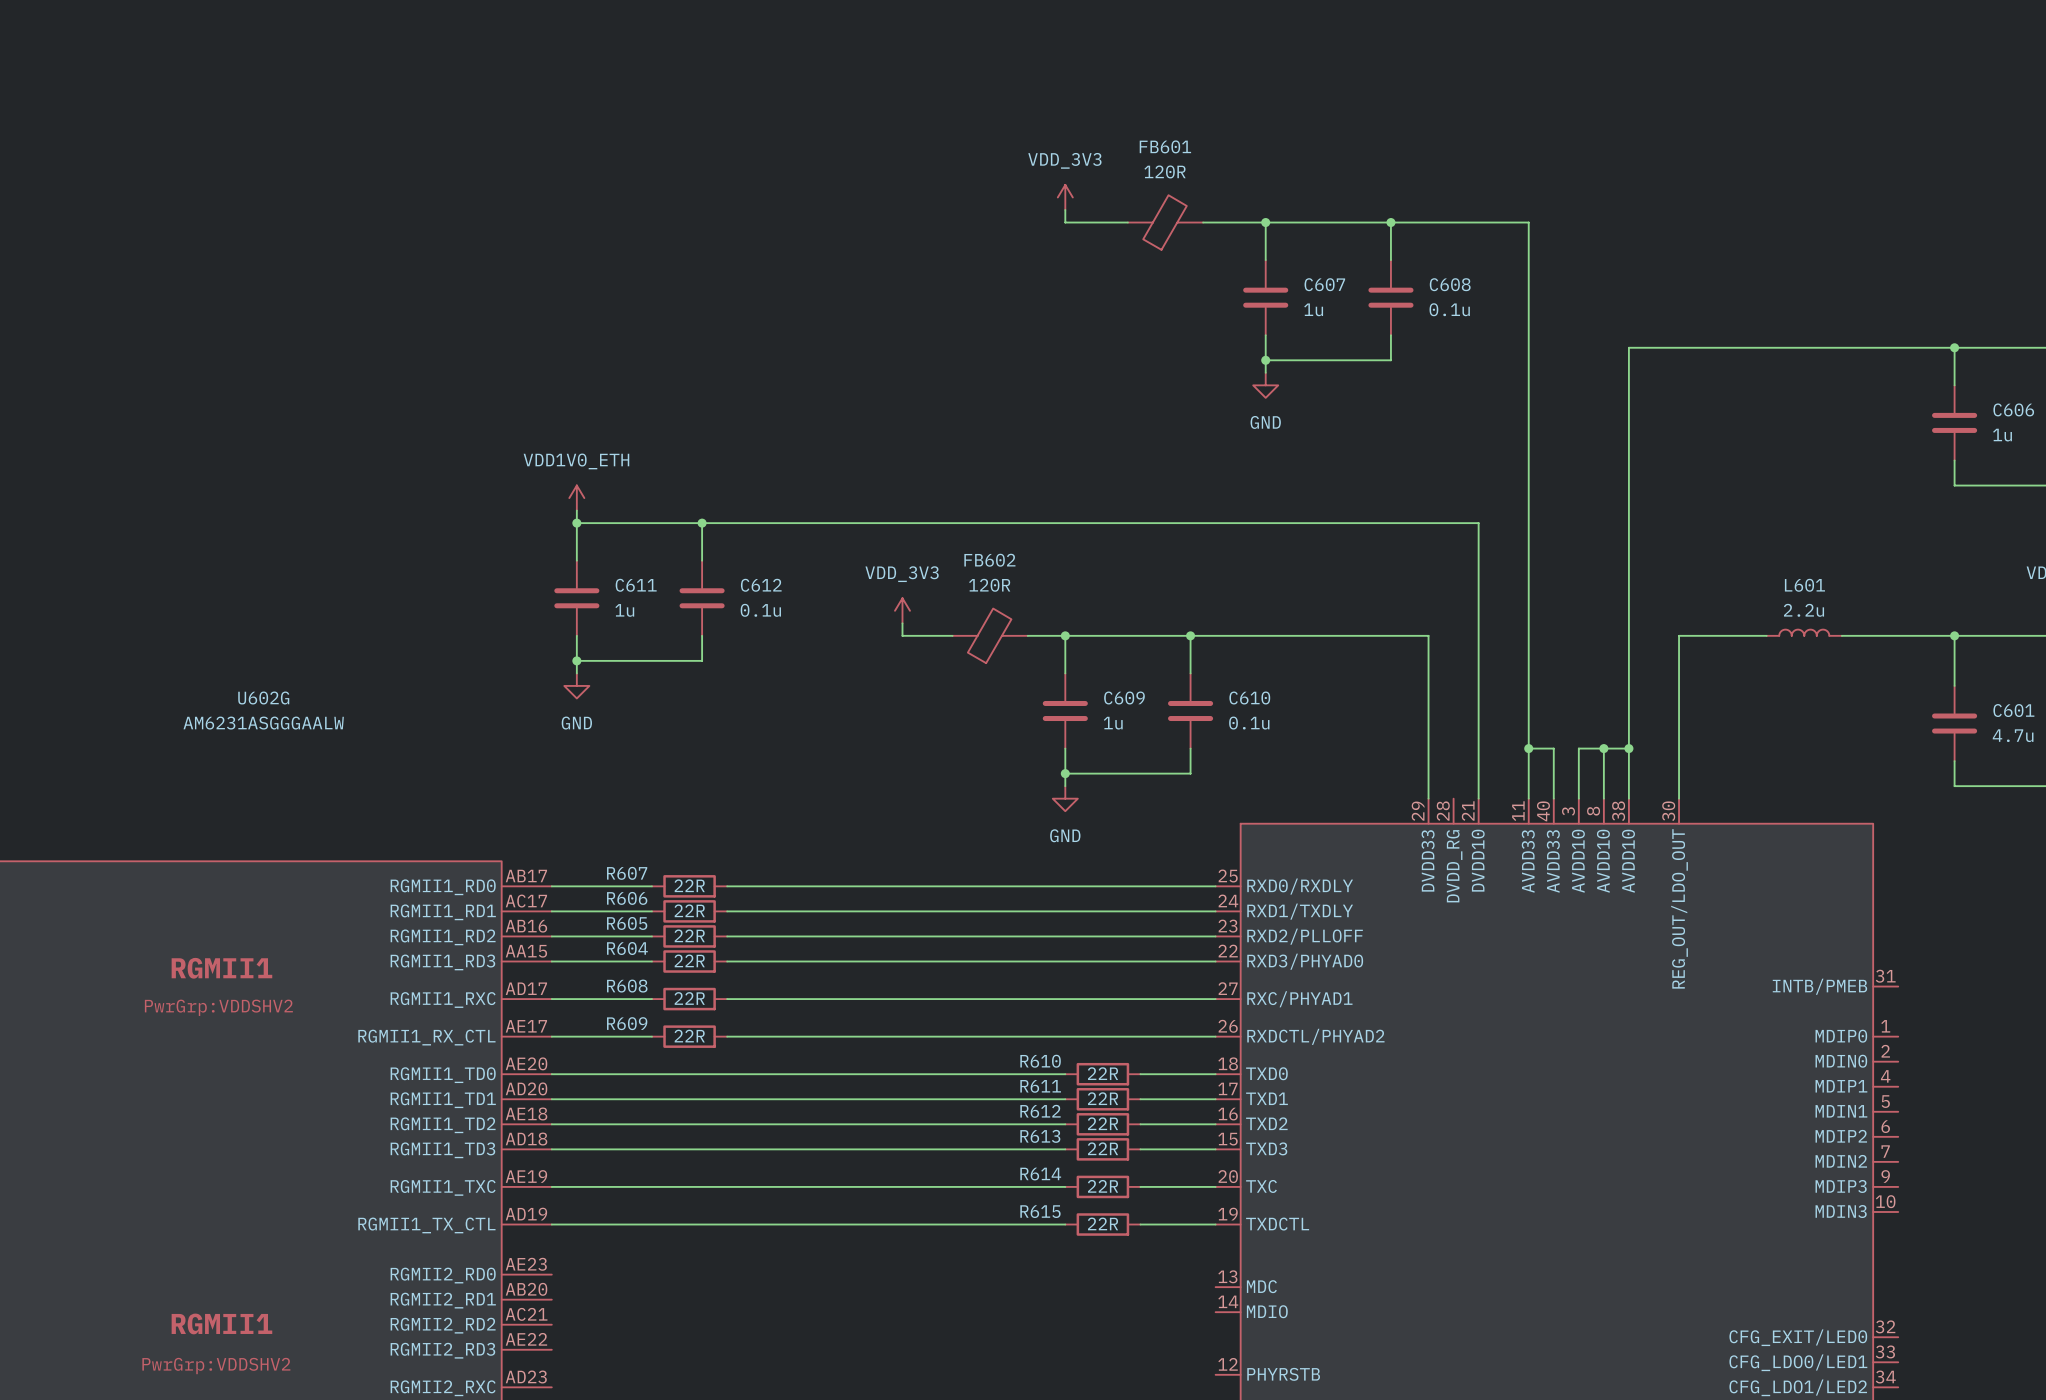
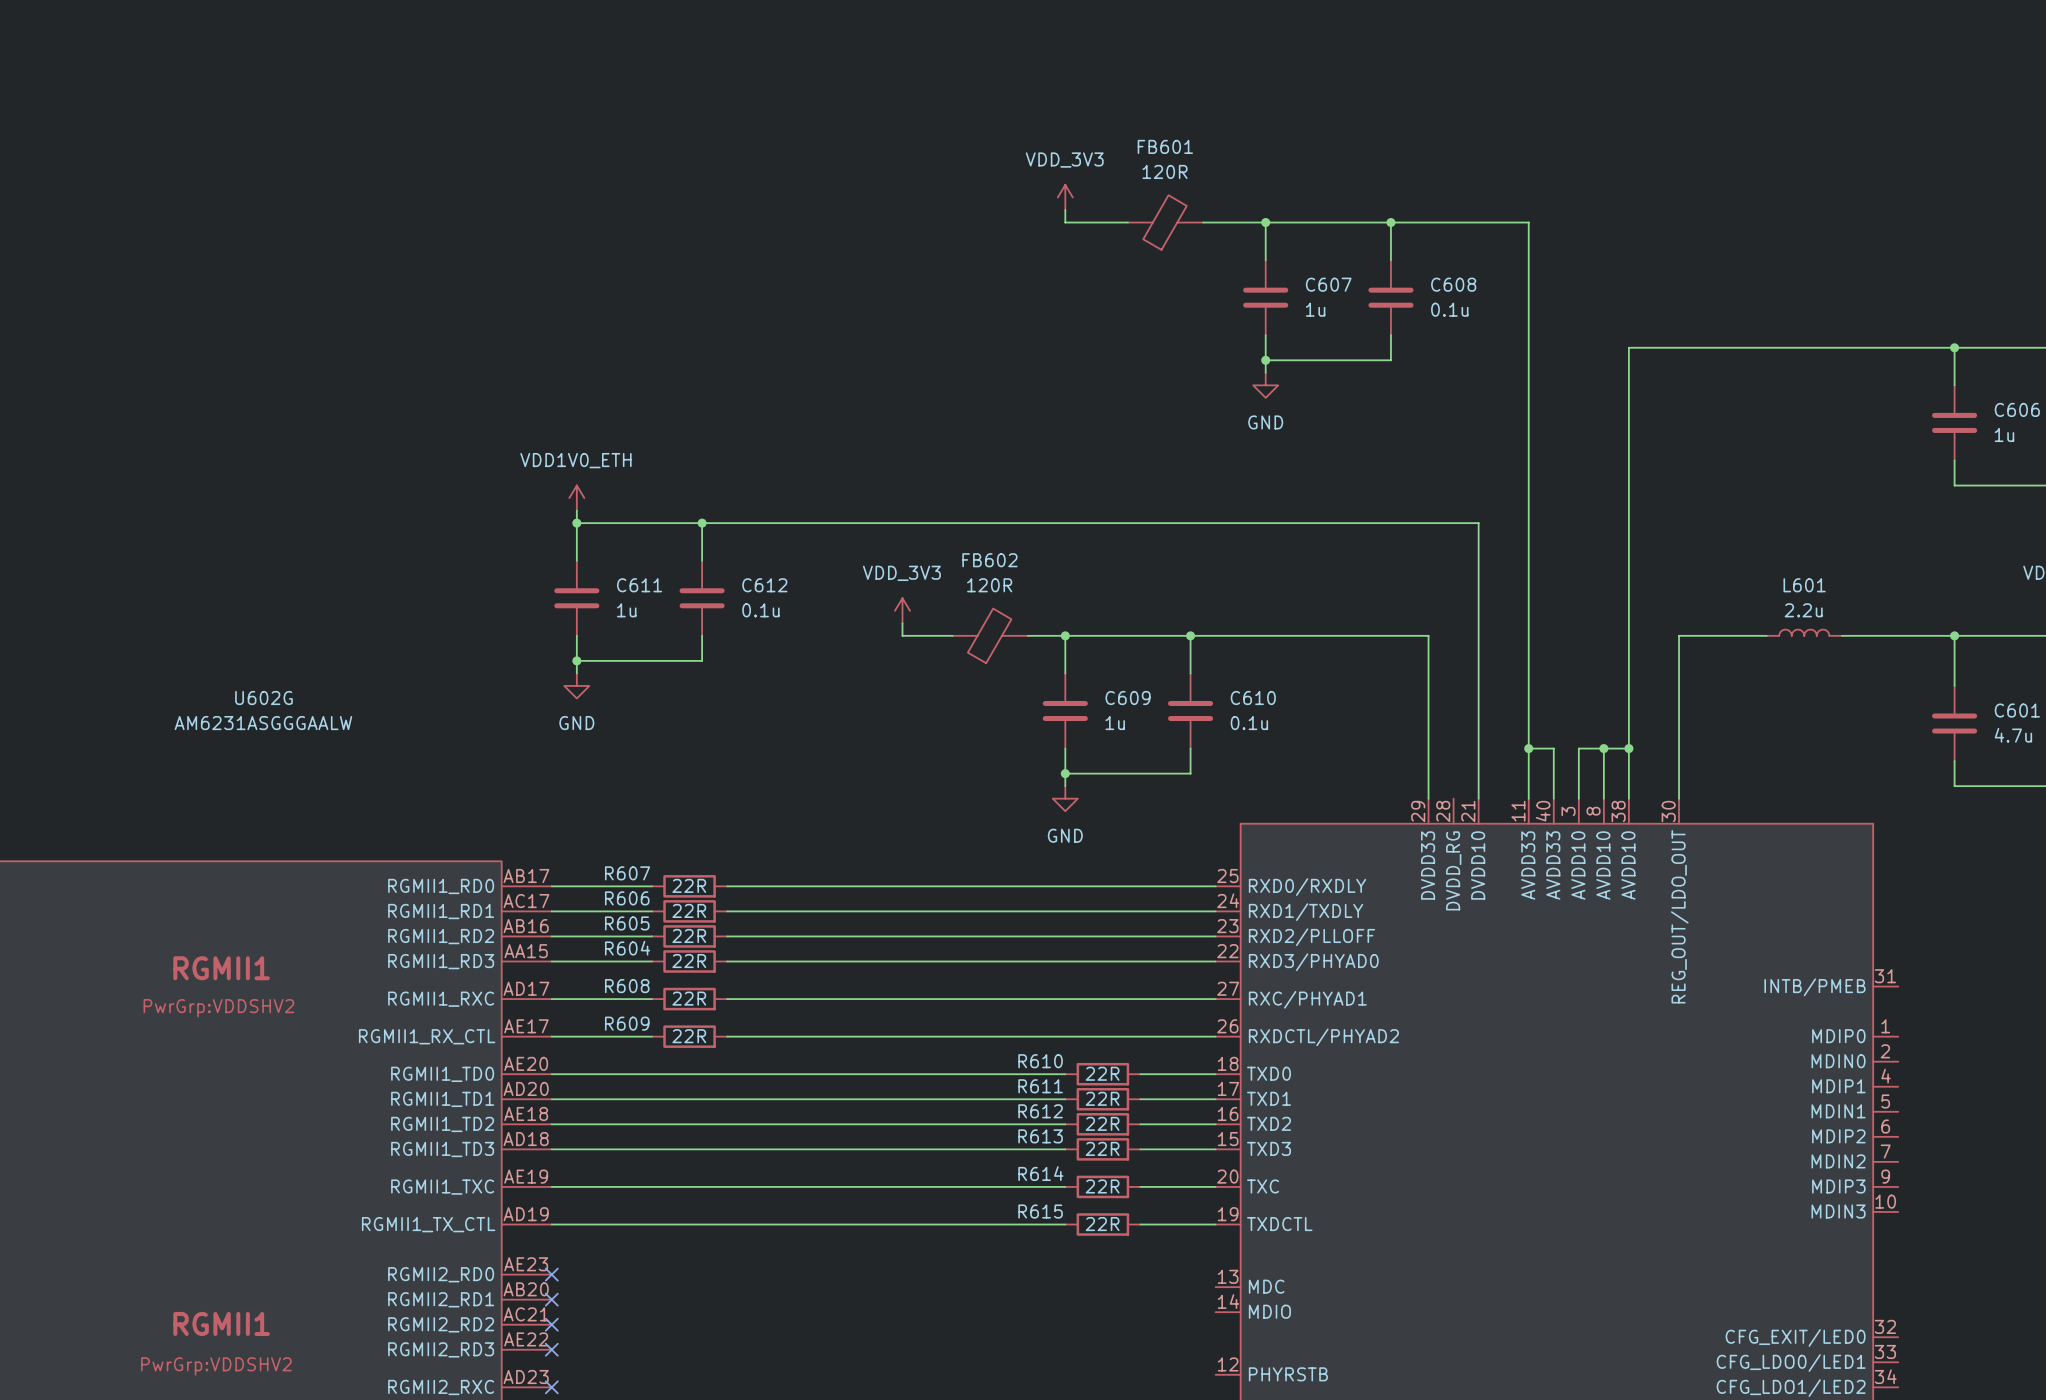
no-connect mark: none -> (551, 1274)
no-connect mark: none -> (551, 1299)
no-connect mark: none -> (551, 1324)
no-connect mark: none -> (551, 1349)
no-connect mark: none -> (551, 1387)

